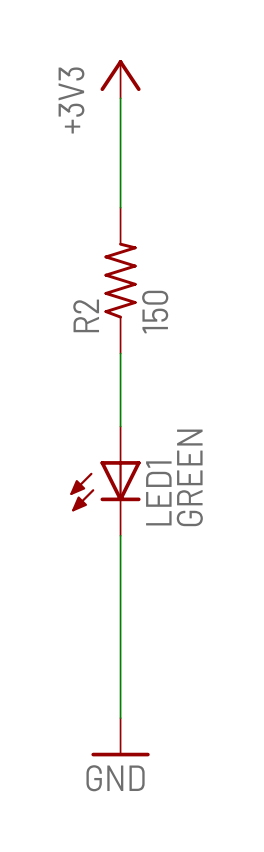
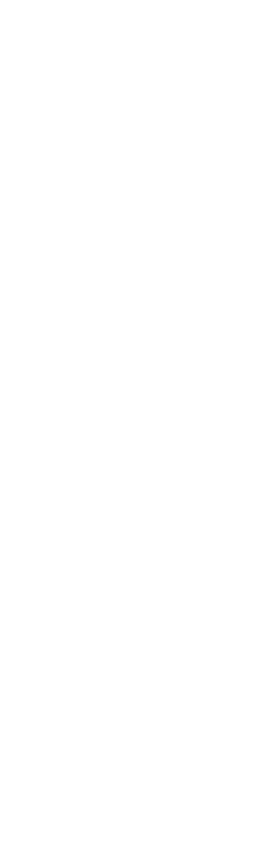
power symbol: +3V3 (120, 79) -> none
wire: (120, 98) (120, 207) -> none
R2: 150 (120, 280) -> none
wire: (120, 353) (120, 426) -> none
LED1: GREEN (105, 481) -> none
wire: (120, 535) (120, 718) -> none
power symbol: GND (120, 737) -> none

